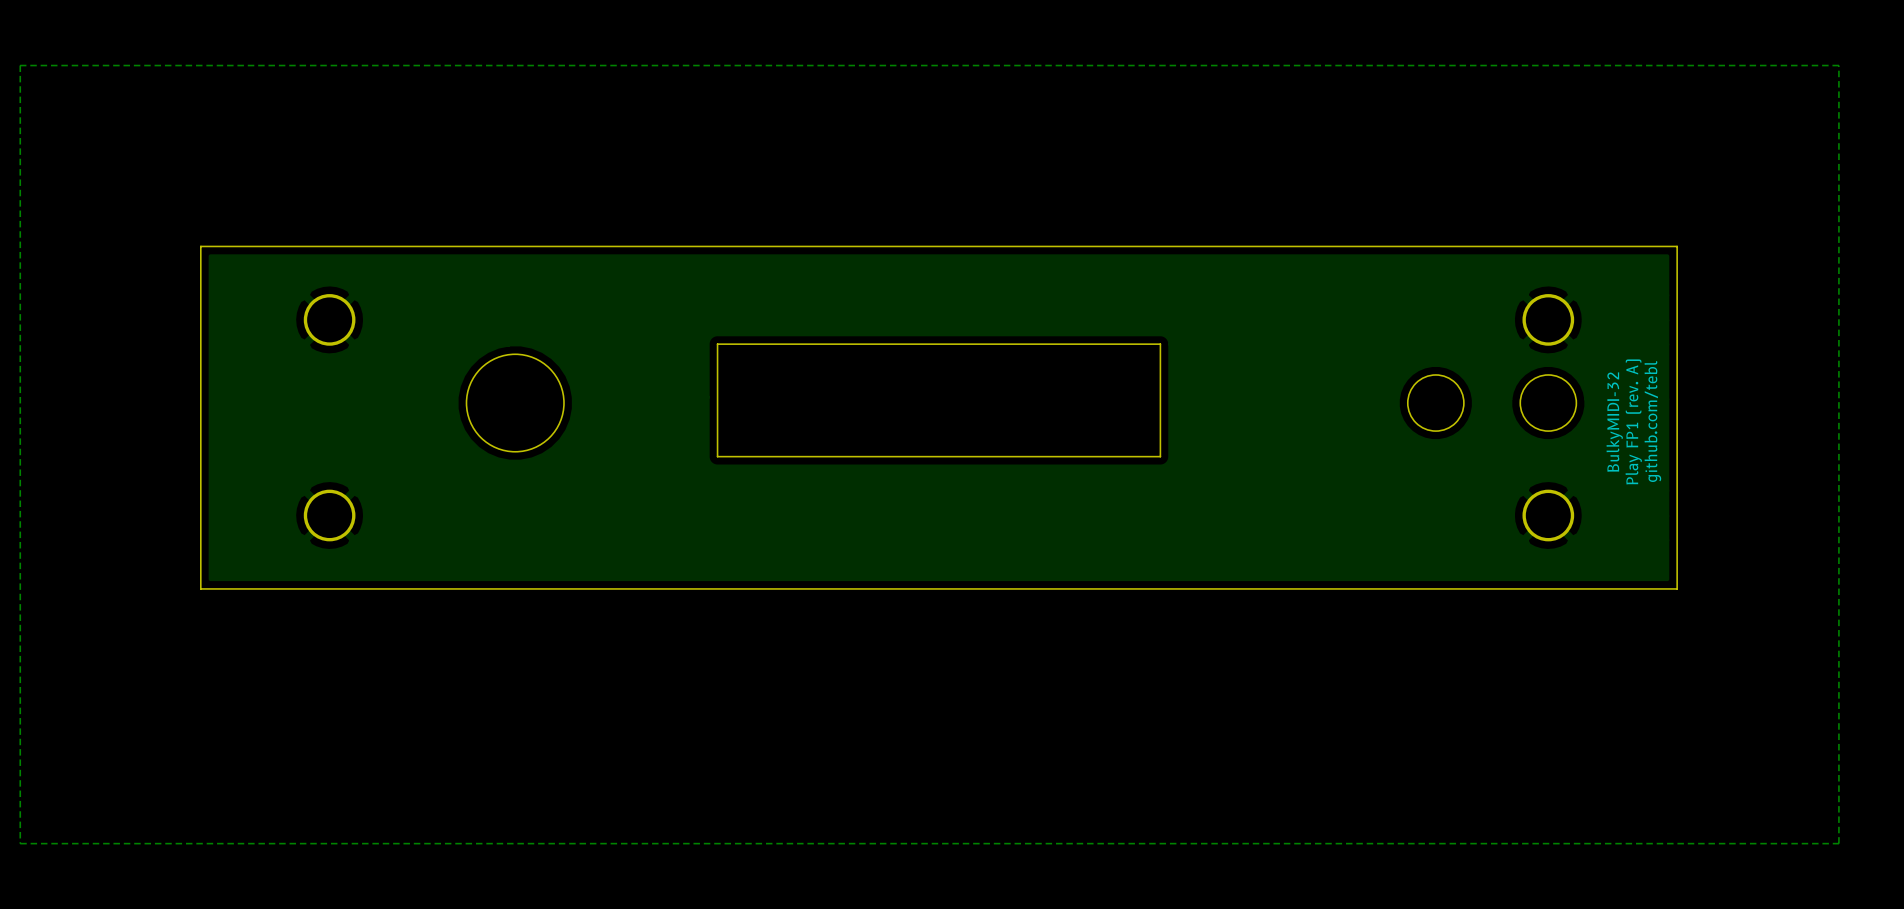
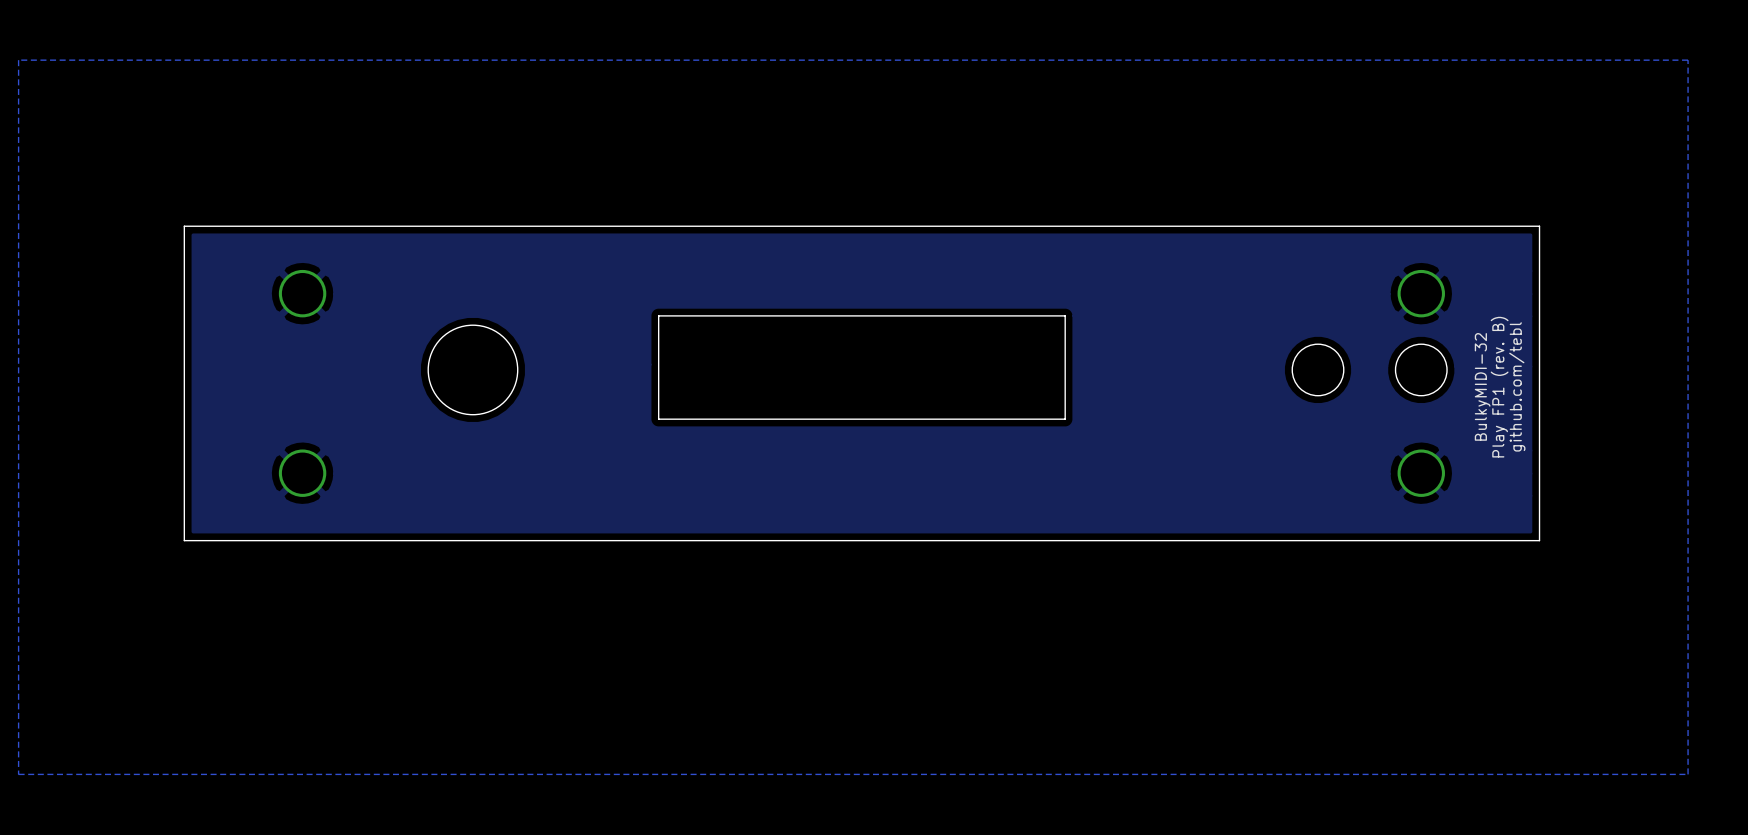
text: Play FP1 (rev. A) (1633, 421) -> Play FP1 (rev. B) (1499, 387)

